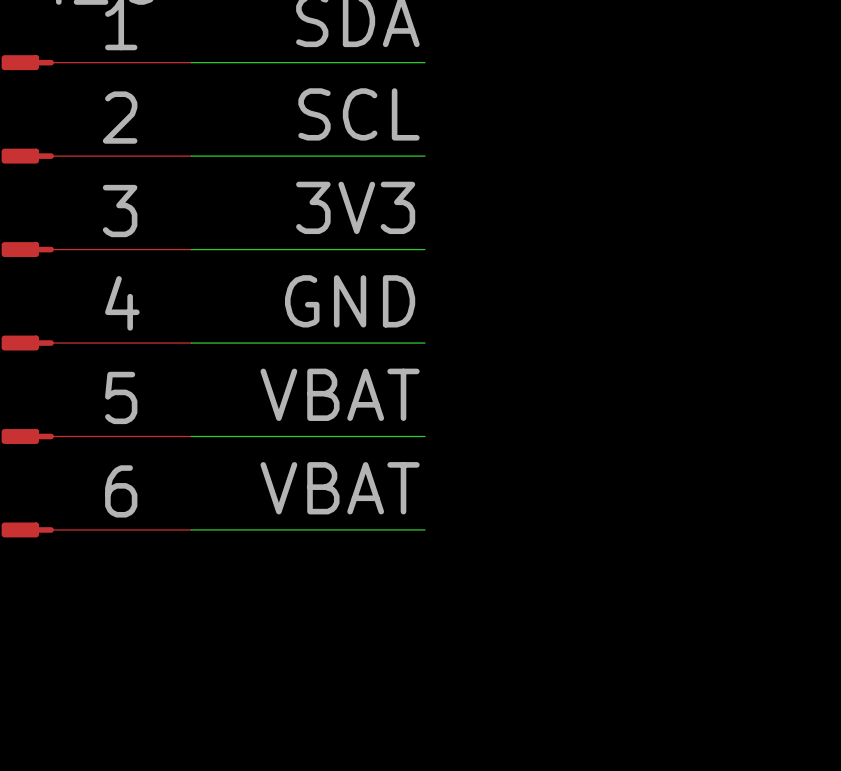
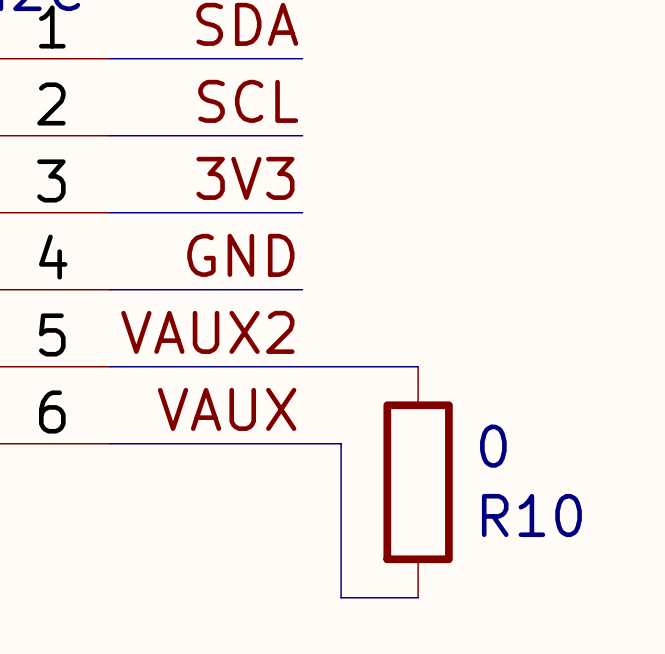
label: VBAT (340, 394) -> VAUX2 (207, 332)
wire: none -> (302, 366) (418, 366)
label: VBAT (340, 488) -> VAUX (227, 409)
wire: none -> (302, 443) (341, 443) (341, 597) (418, 597)
R10: none -> 0 (418, 482)

